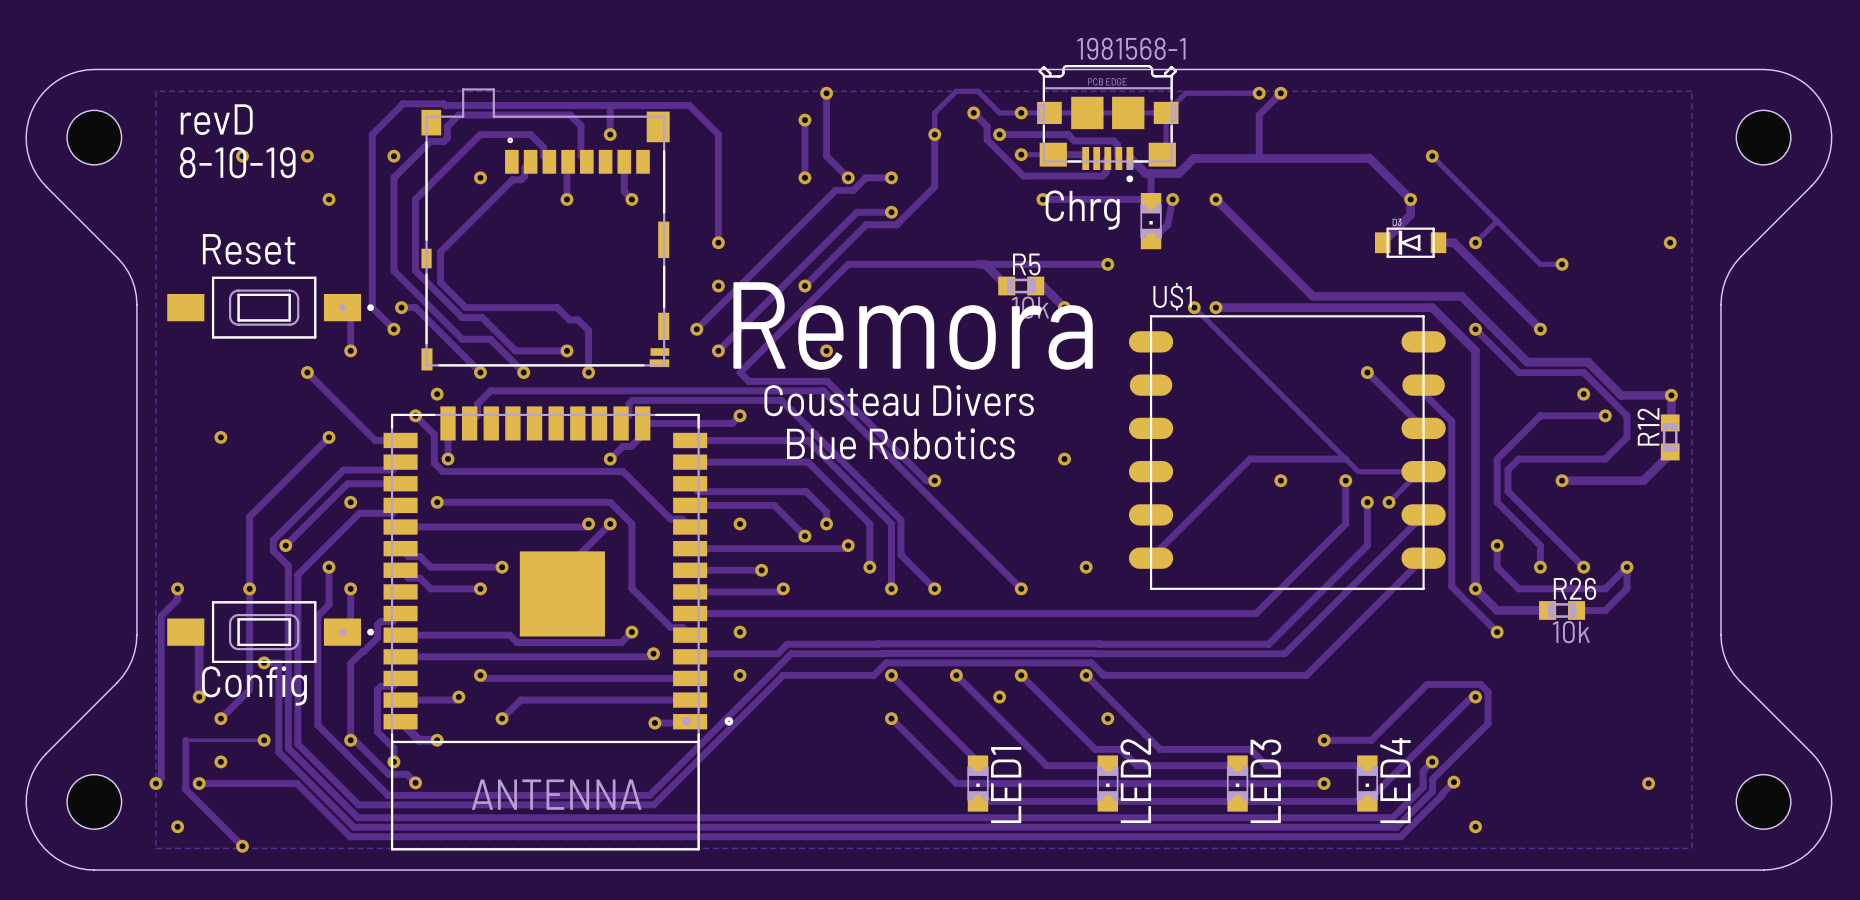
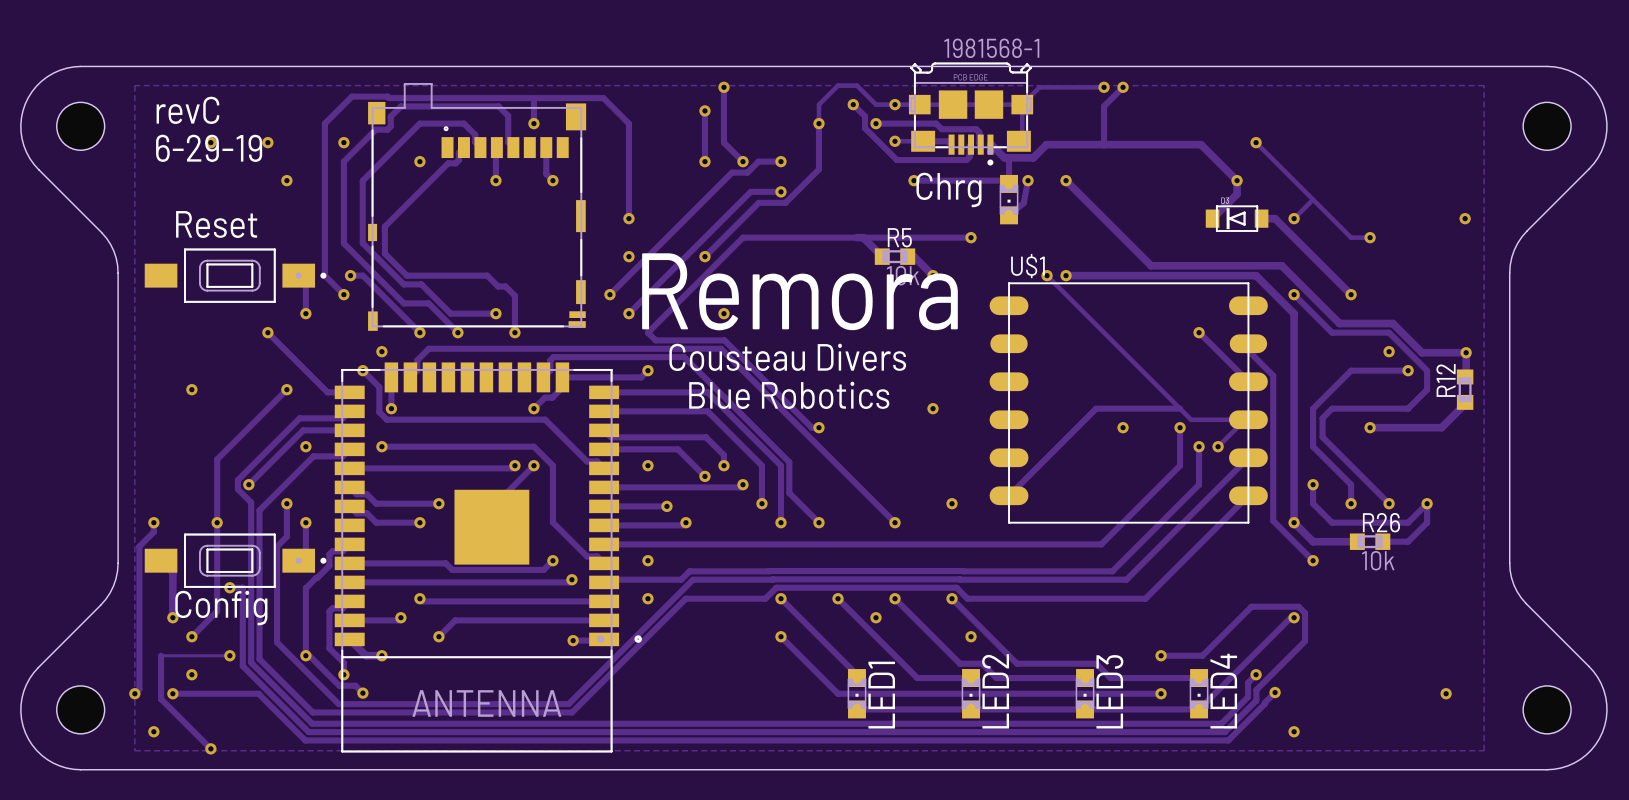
text: revD (216, 119) -> revC (187, 110)
text: 8-10-19 (237, 162) -> 6-29-19 (209, 148)

